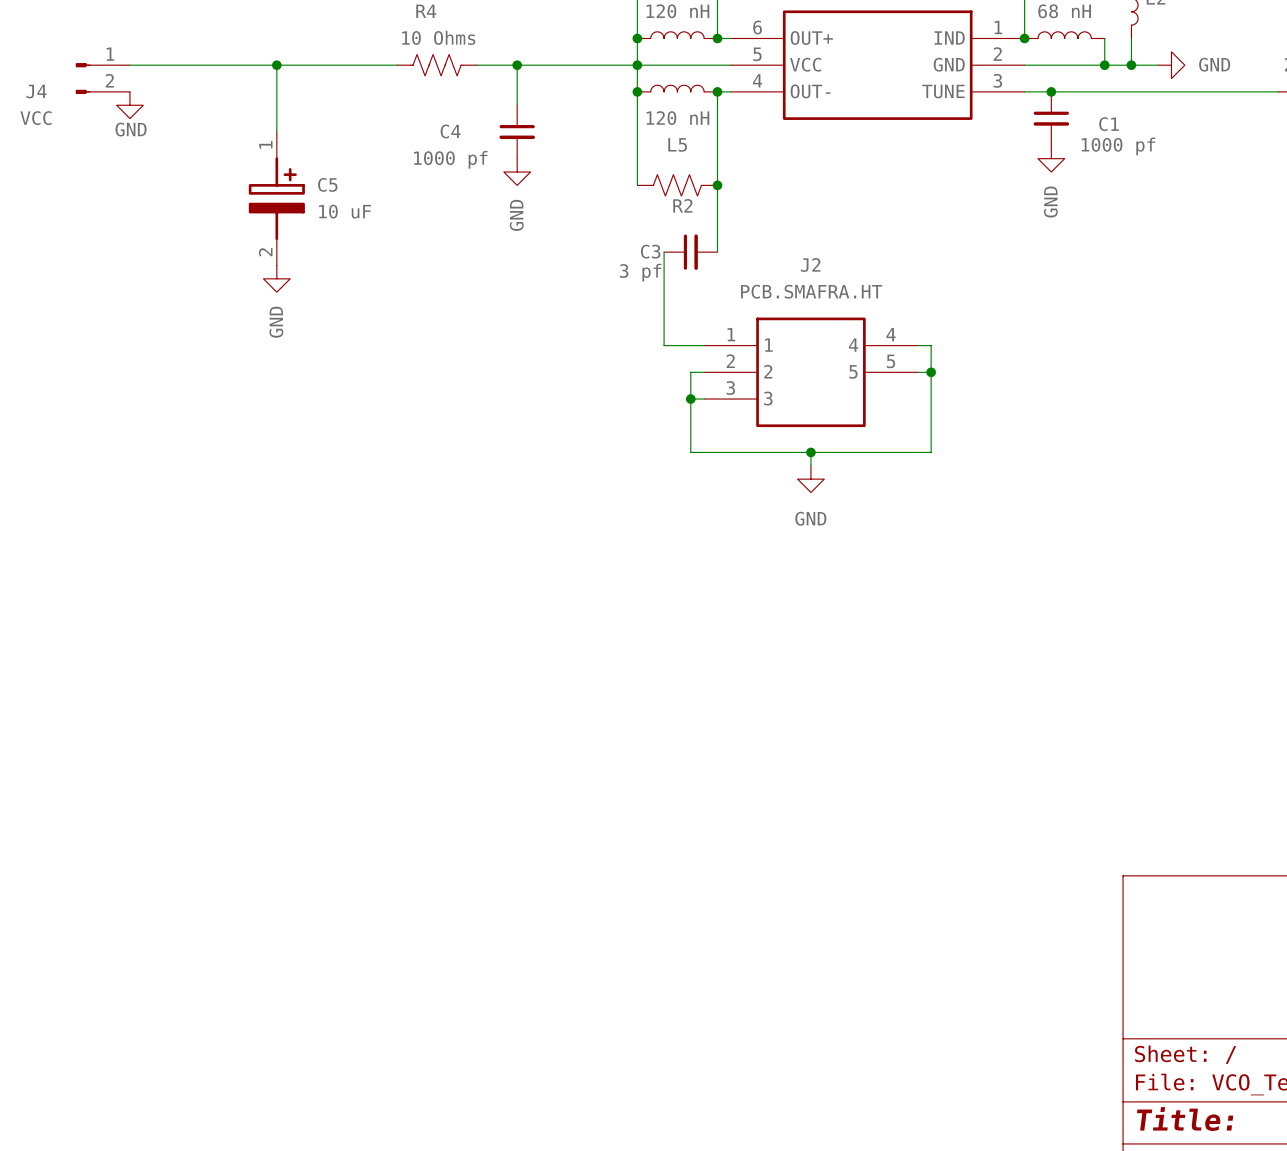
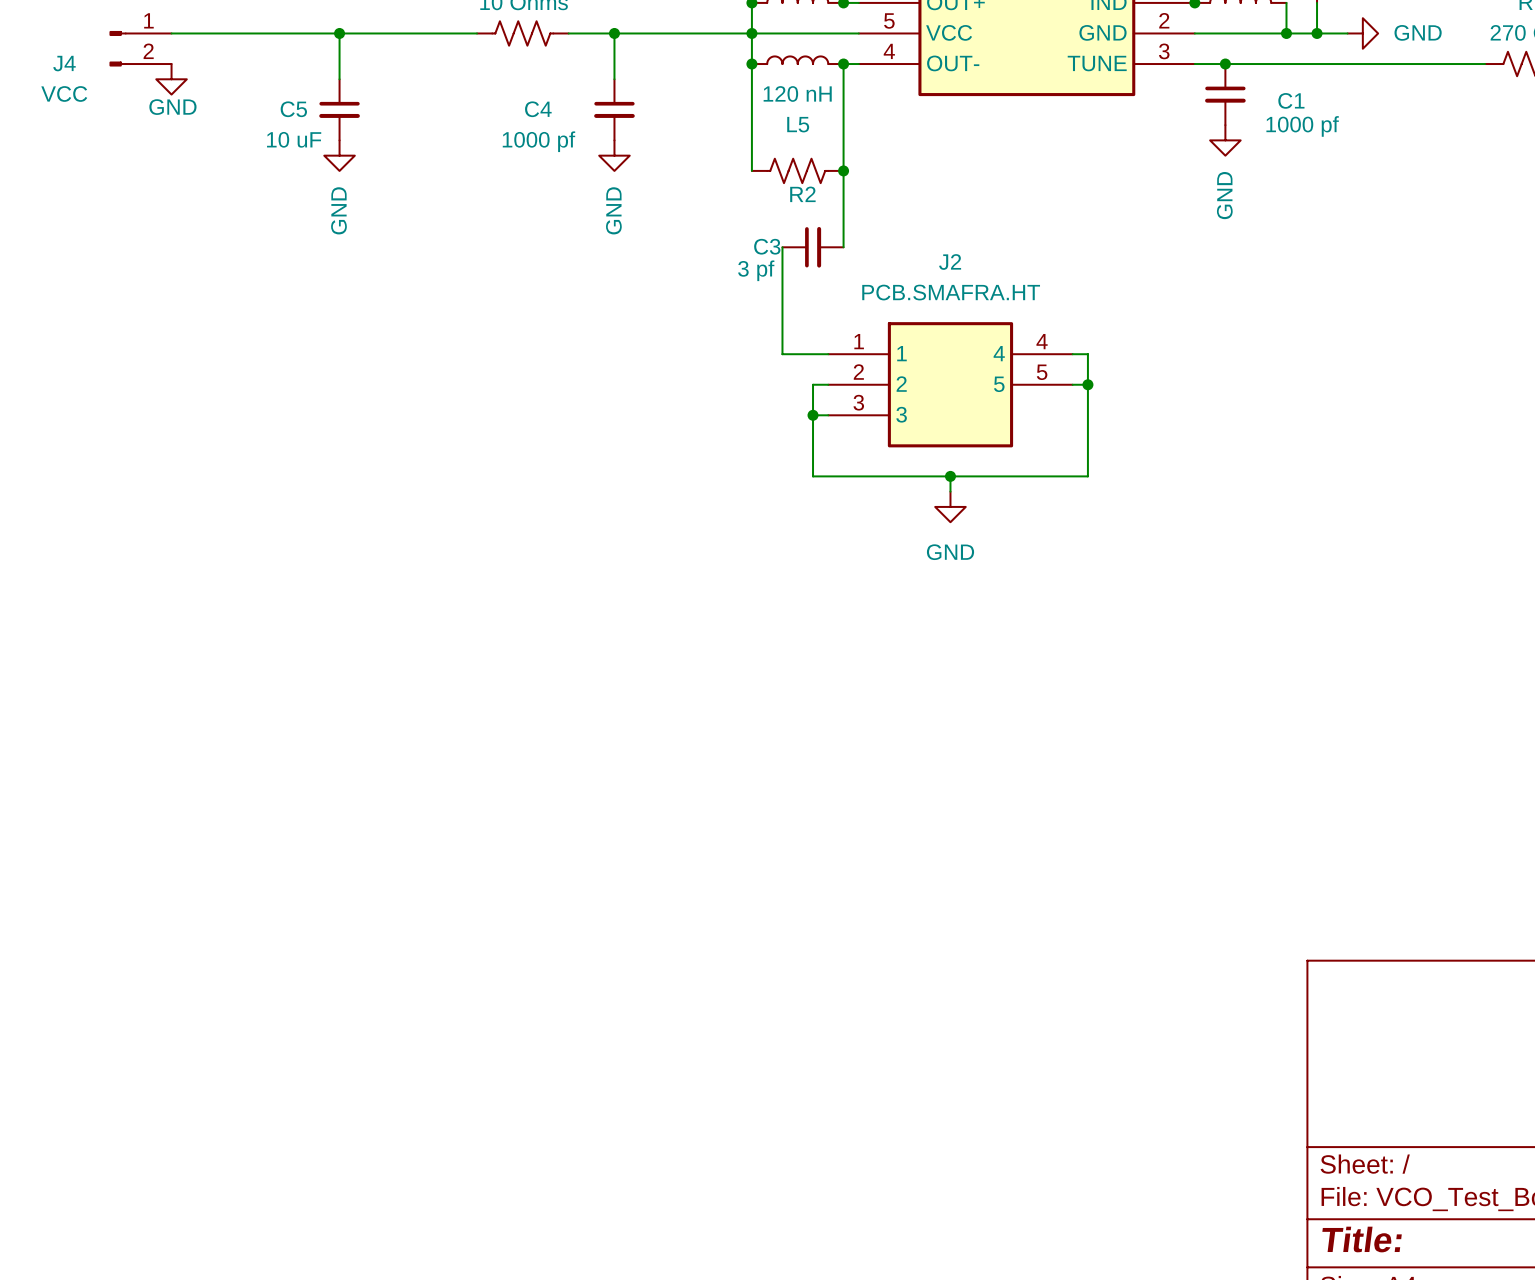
C5 symbol: [248, 131, 305, 266] -> [319, 79, 360, 141]
C5 name position: C5 (327, 184) -> C5 (293, 109)
C5 value position: 10 uF (345, 211) -> 10 uF (294, 139)
power symbol position: GND (276, 278) -> GND (339, 155)

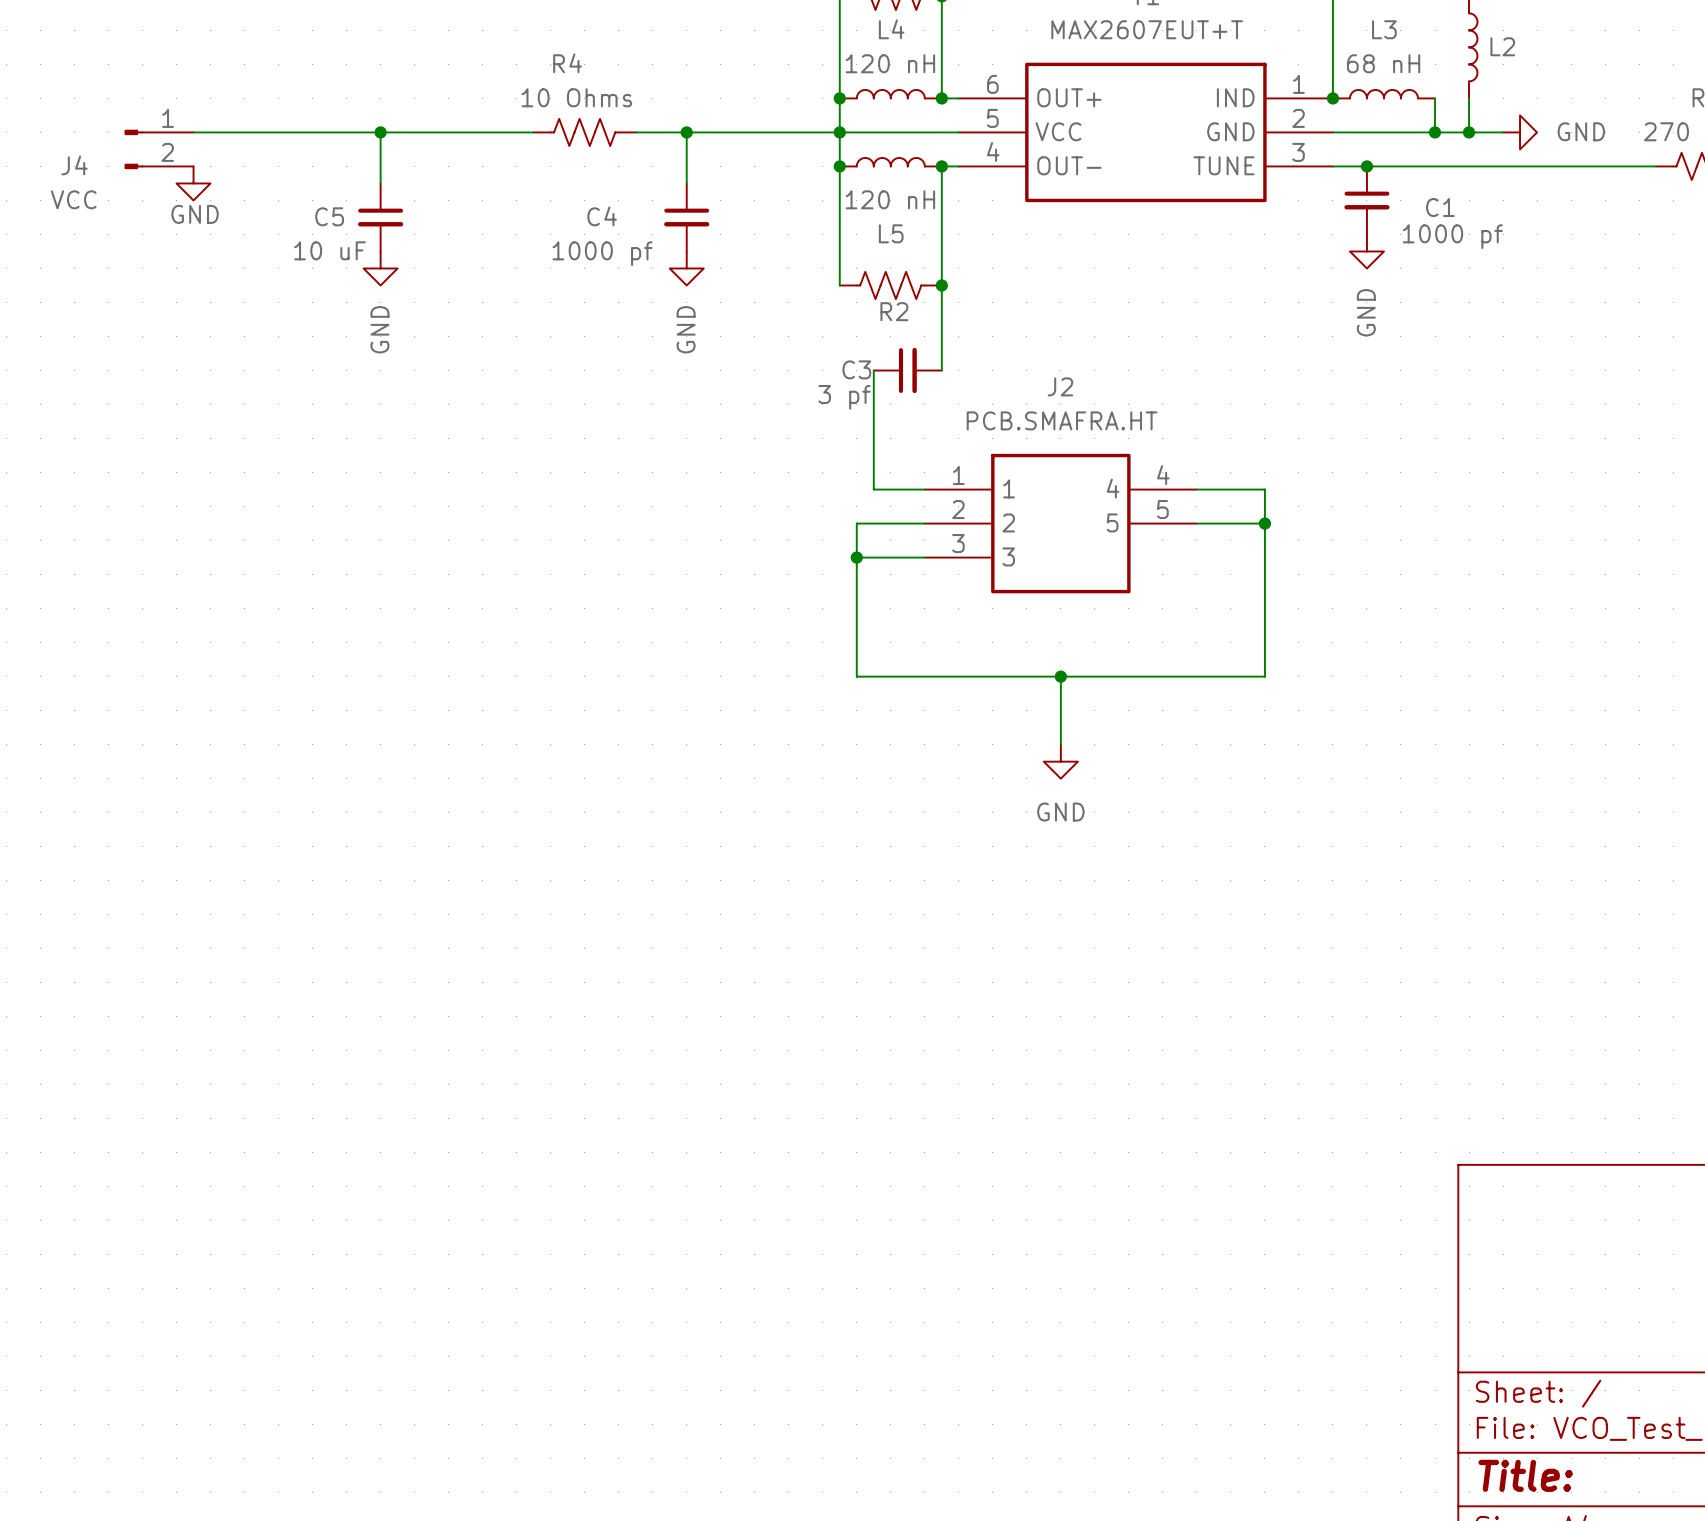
wire: (1087, 354) (1087, 476) (813, 476) (813, 384) -> (1213, 489) (1264, 489) (1264, 676) (856, 676) (856, 523) (907, 523)
wire: none -> (1213, 523) (1264, 523)
junction position: (1087, 384) -> (1264, 523)
wire: none -> (856, 557) (907, 557)
junction position: (813, 415) -> (856, 557)
wire: (950, 476) (950, 491) -> none
junction position: (950, 476) -> (1060, 676)
power symbol position: GND (950, 506) -> GND (1060, 761)
wire: none -> (1060, 676) (1060, 744)

